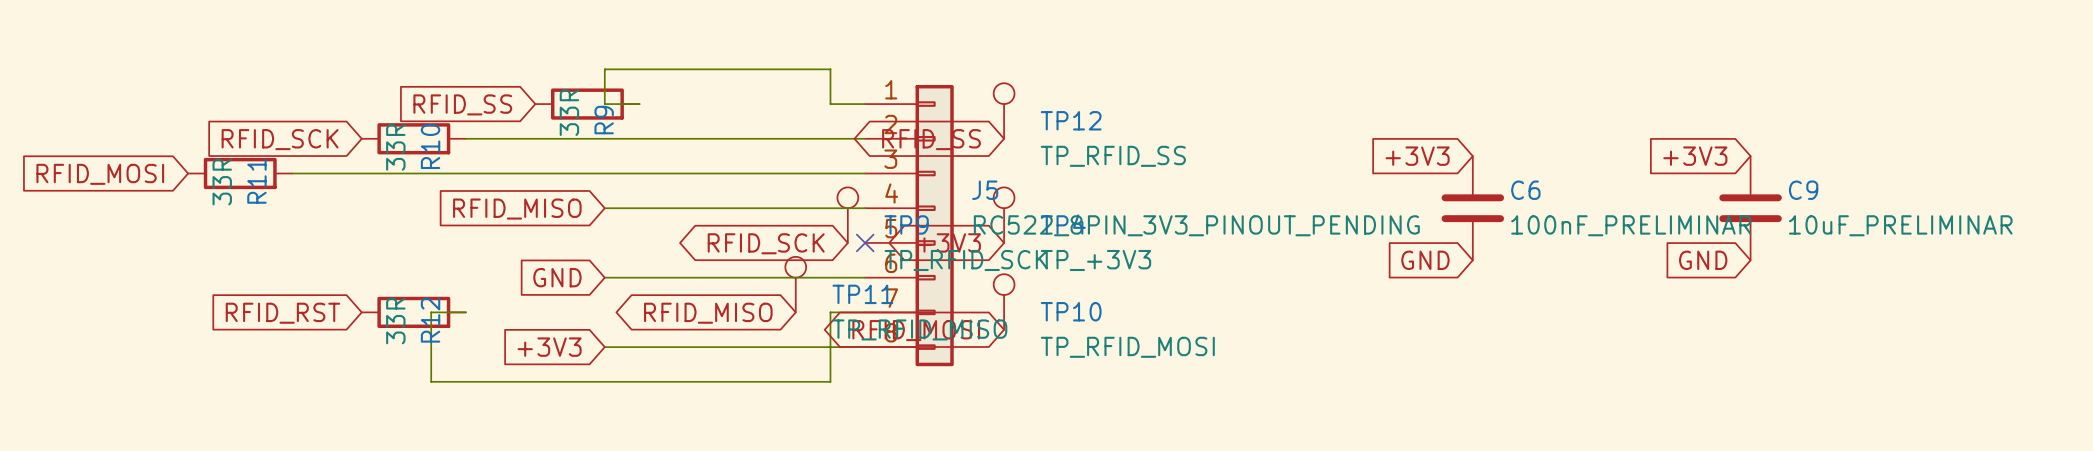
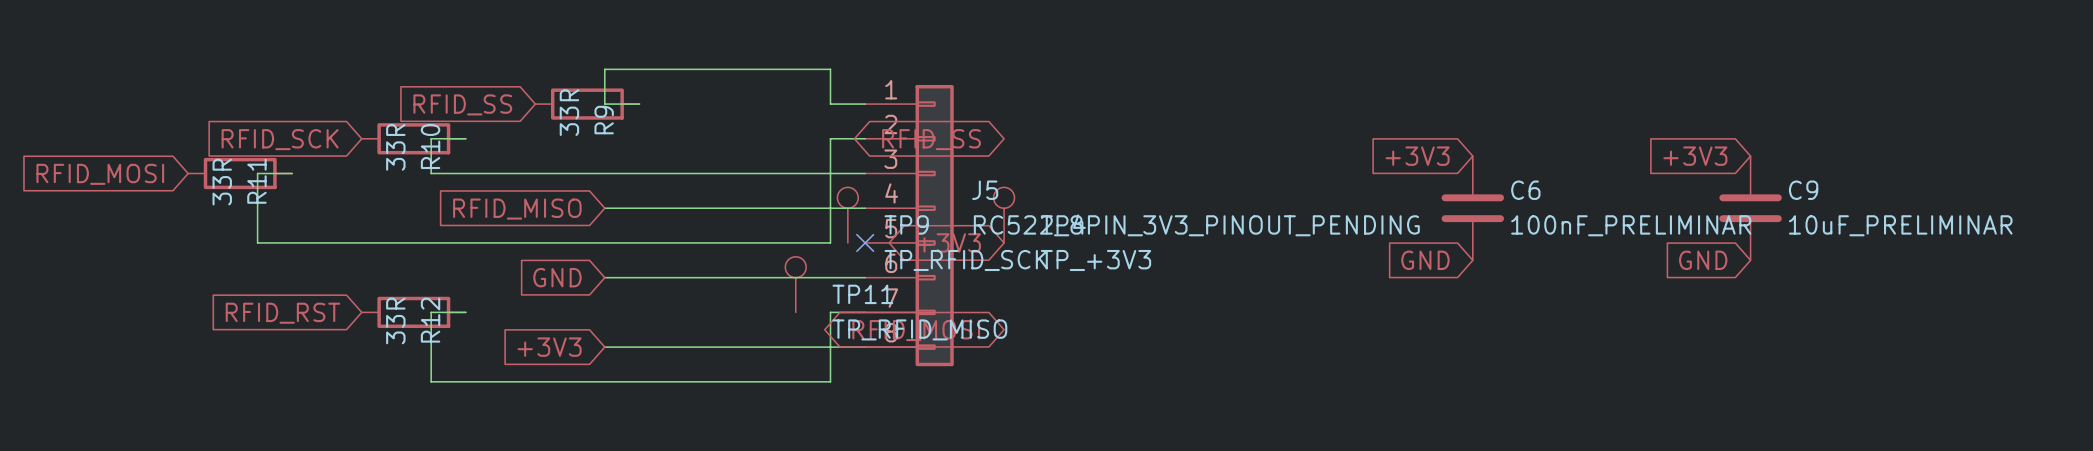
TP12: TP_RFID_SS (1004, 111) -> none
wire: (465, 138) (830, 138) -> (292, 173) (257, 173) (257, 242) (830, 242) (830, 138)
wire: (292, 173) (431, 173) -> (465, 138) (431, 138) (431, 173)
global label: RFID_SCK (766, 243) -> none
TP10: TP_RFID_MOSI (1004, 301) -> none
global label: RFID_MISO (708, 313) -> none

